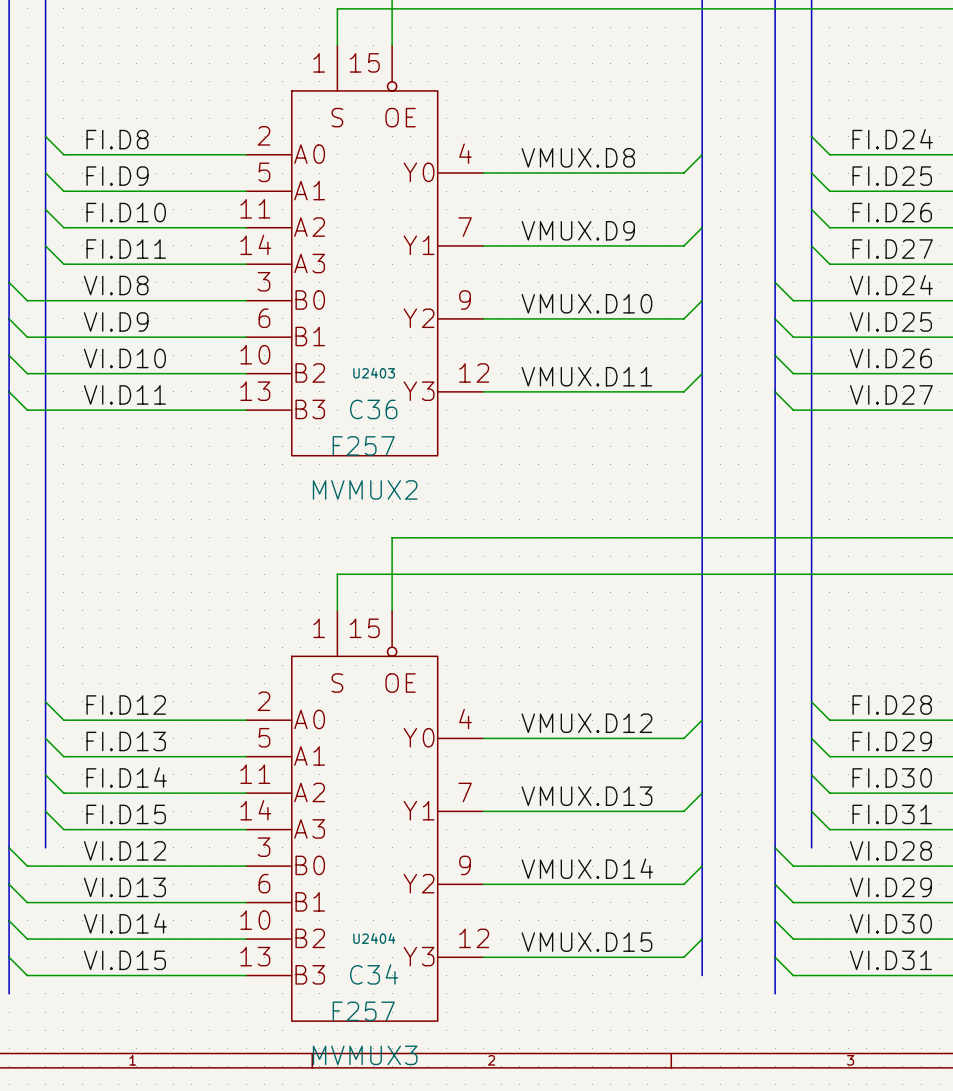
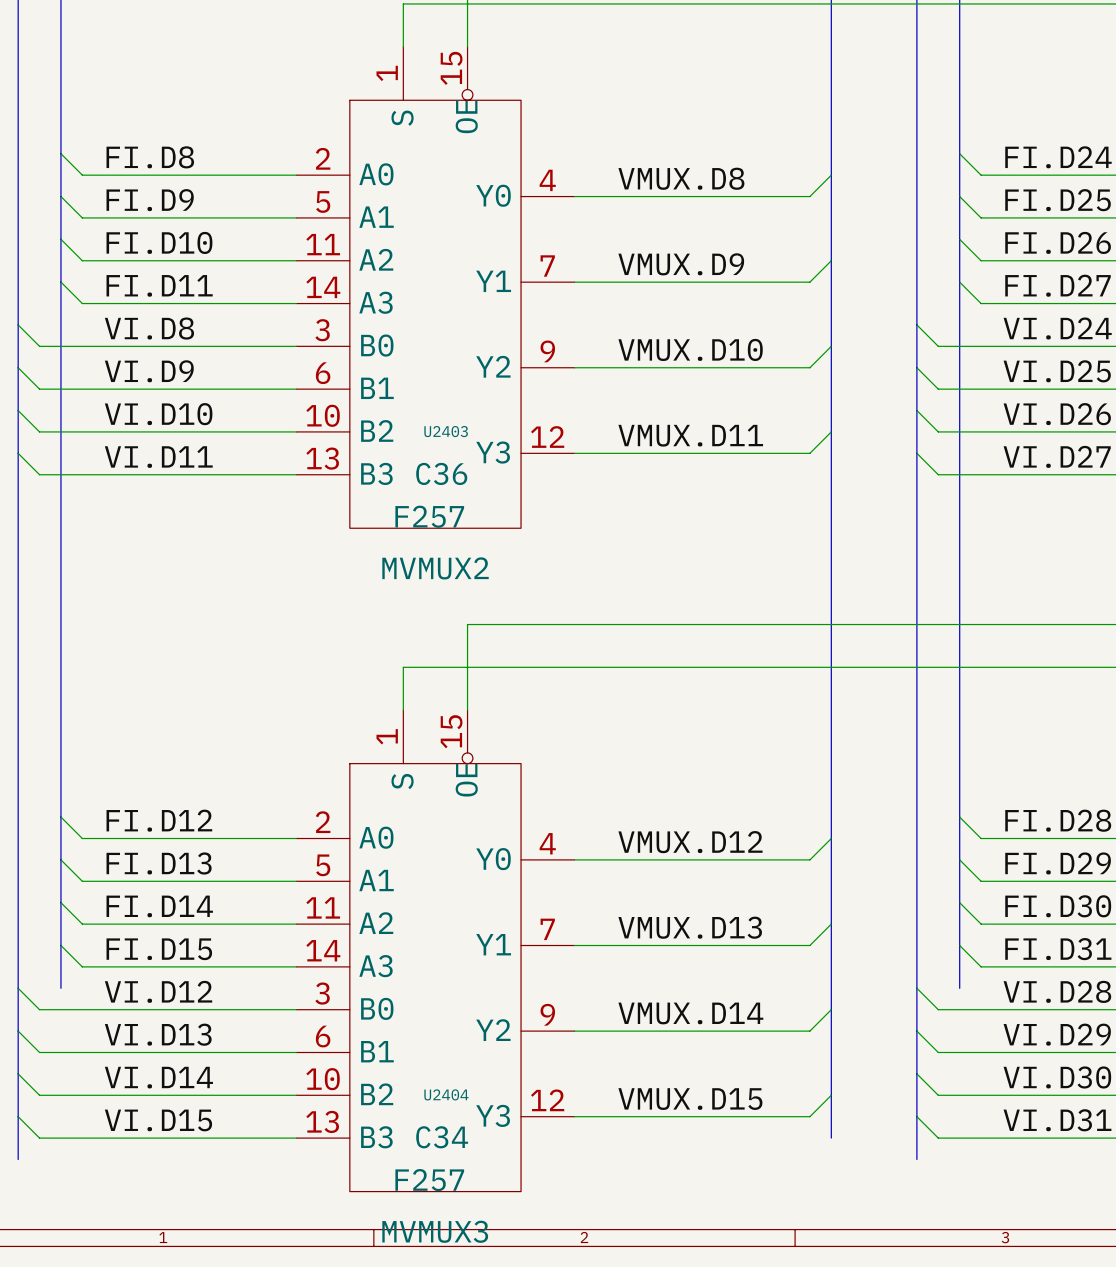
U2403 symbol: [246, 45, 484, 456] -> [296, 46, 575, 529]
U2404 symbol: [246, 610, 484, 1022] -> [296, 710, 575, 1192]

